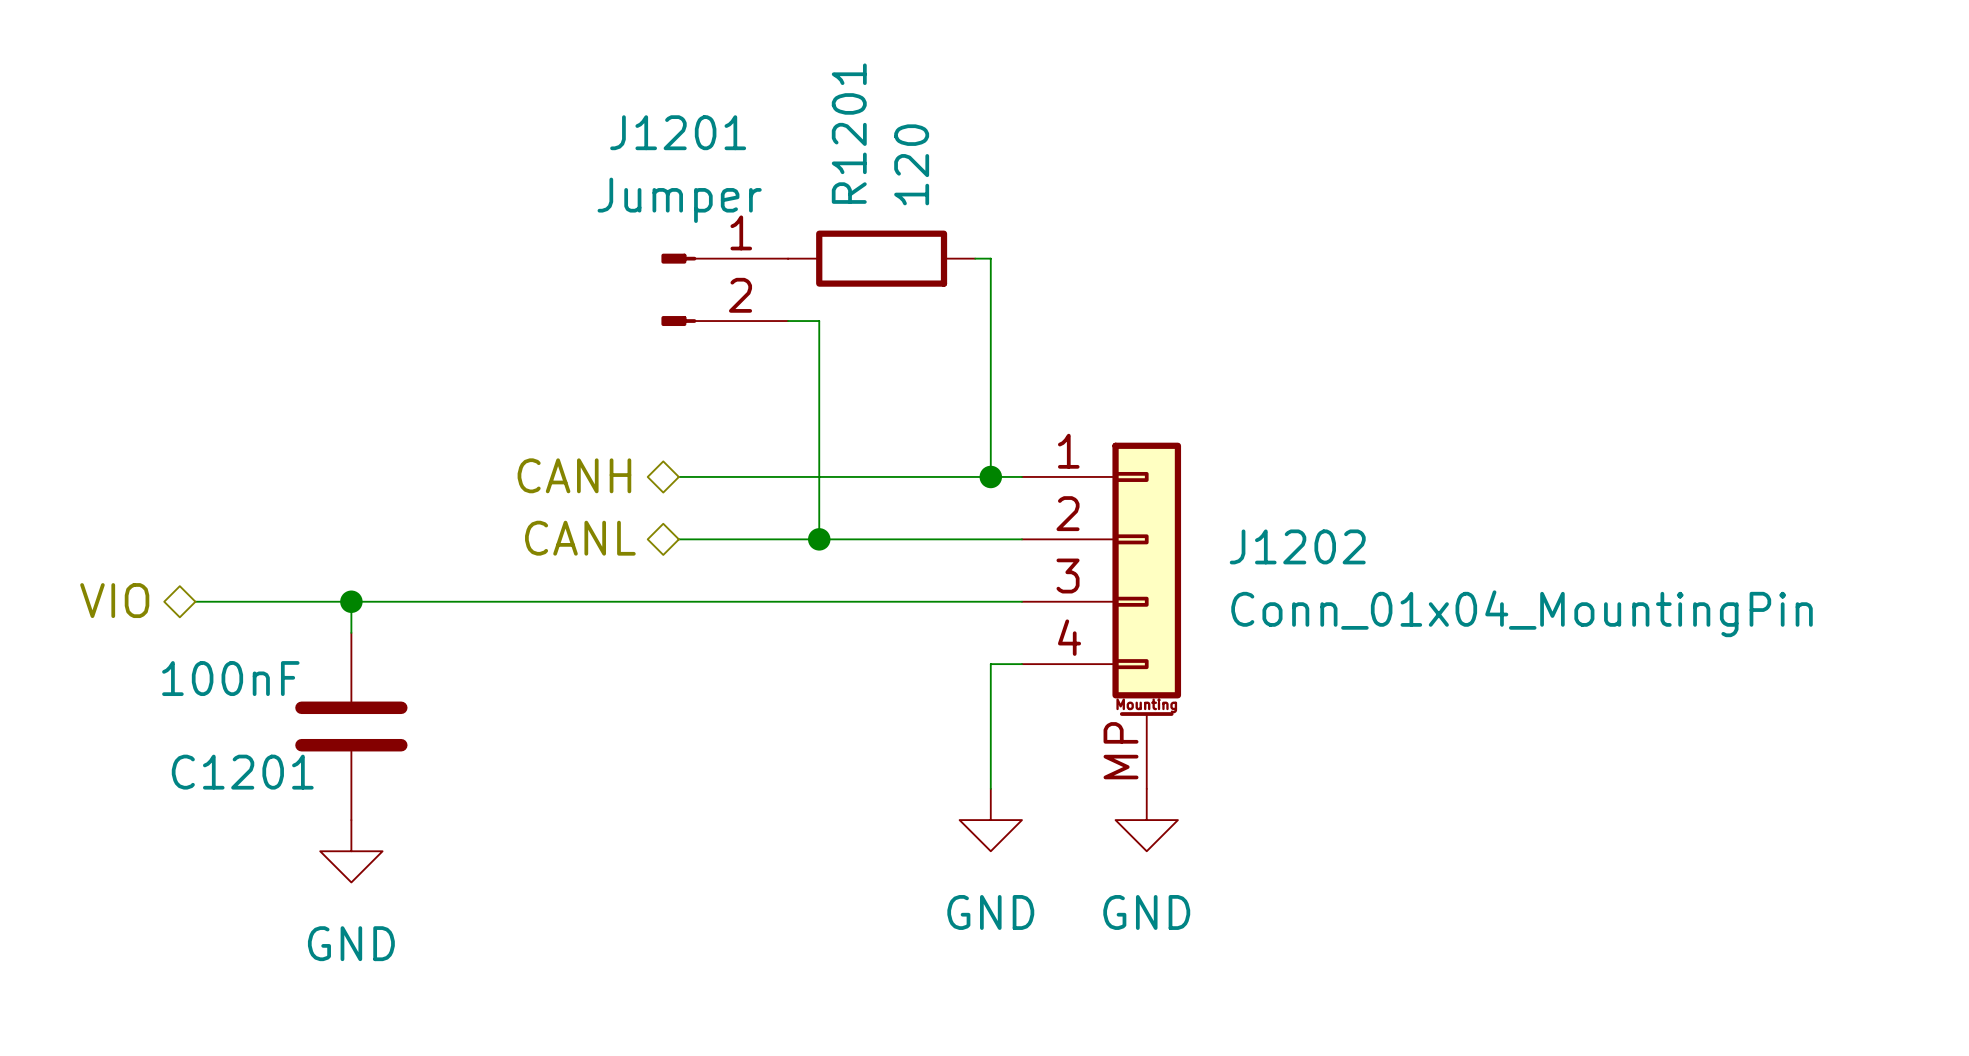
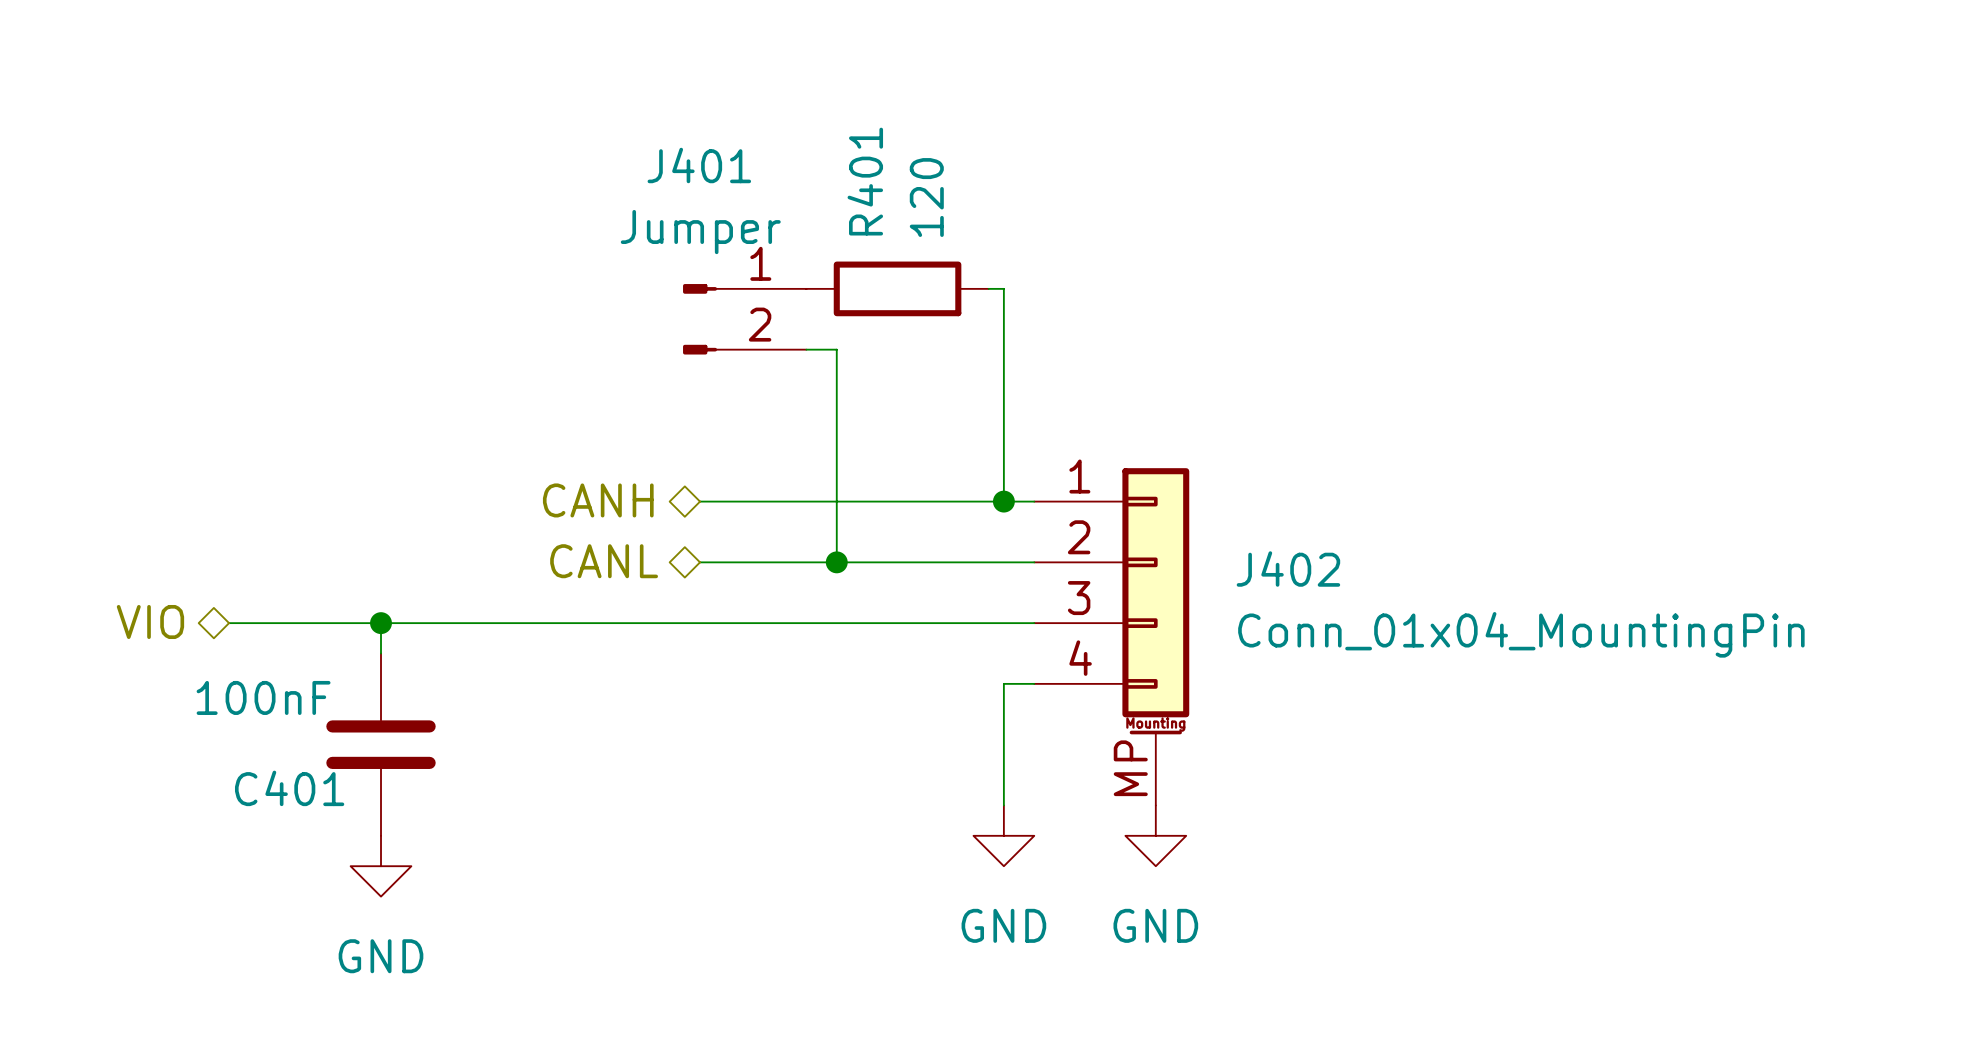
J1201 name: J1201 (678, 132) -> J401 (699, 165)
R1201 name: R1201 (849, 133) -> R401 (865, 181)
J1202 name: J1202 (1297, 546) -> J402 (1288, 569)
C1201 name: C1201 (242, 772) -> C401 (289, 788)

